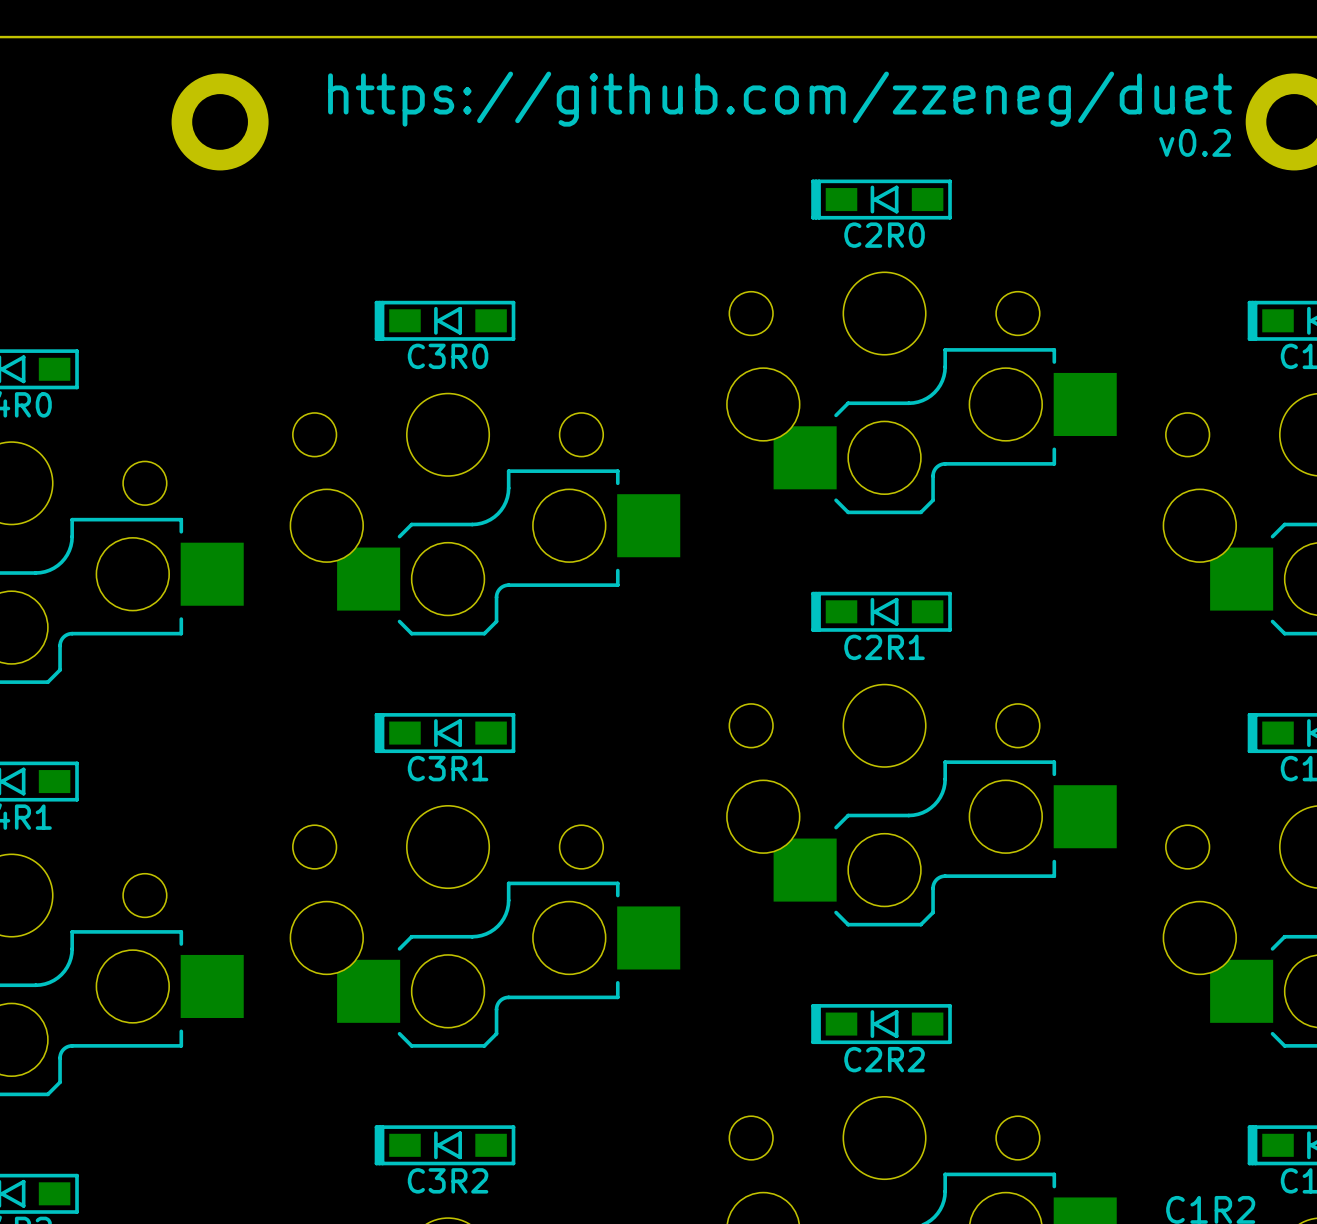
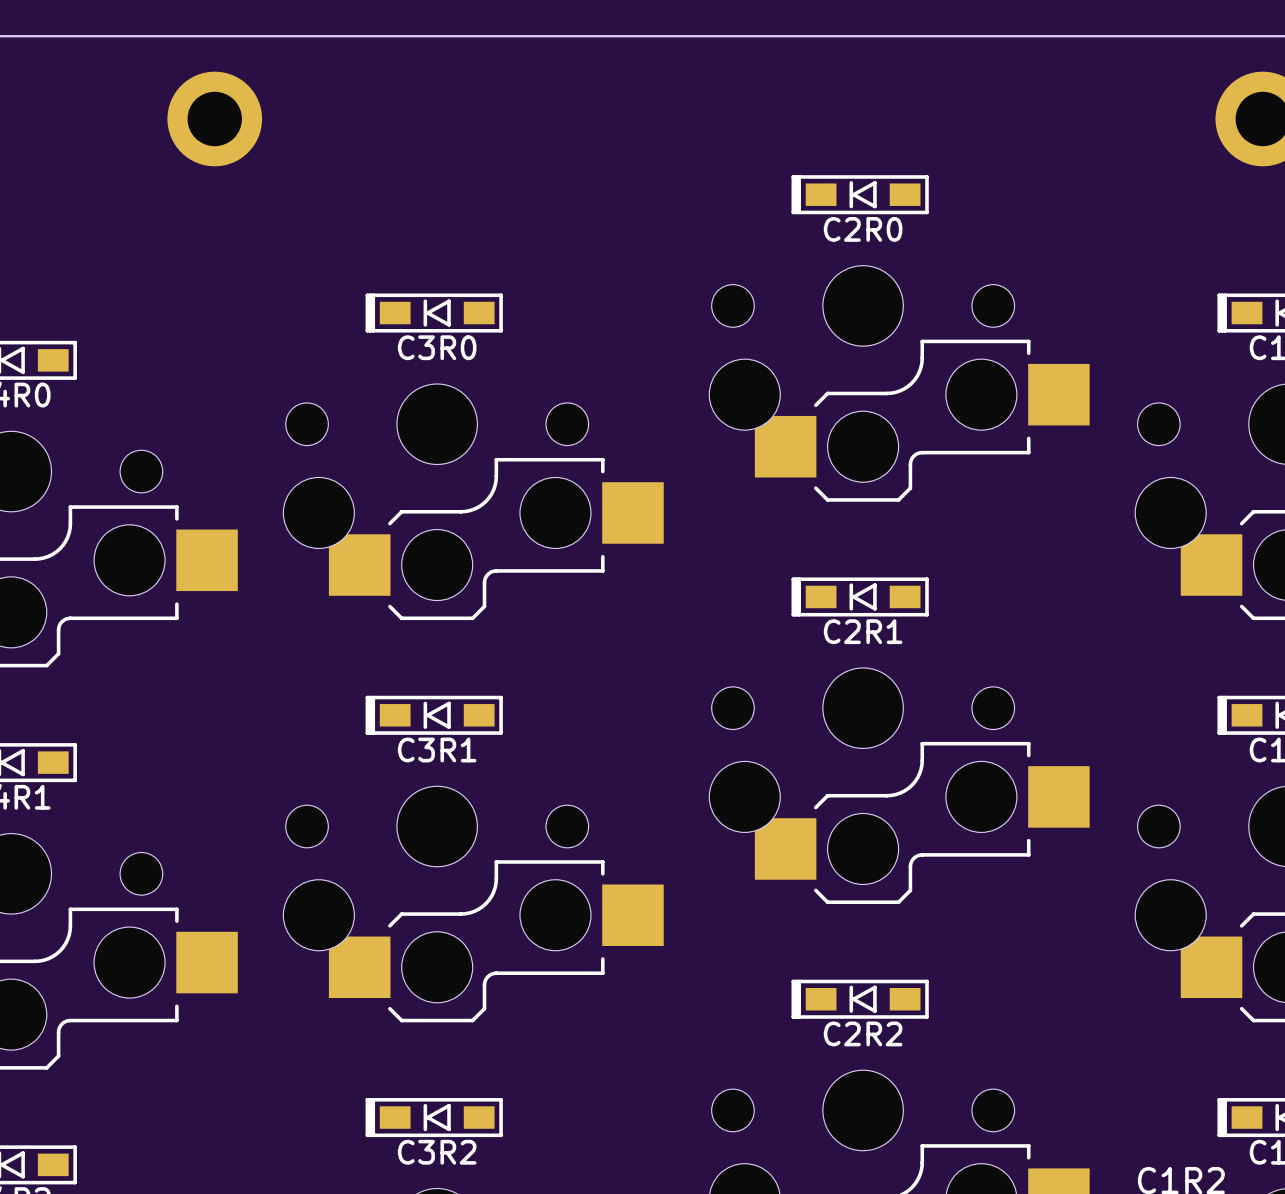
text: https://github.com/zzeneg/duet (780, 99) -> none
text: v0.2 (1195, 142) -> none

